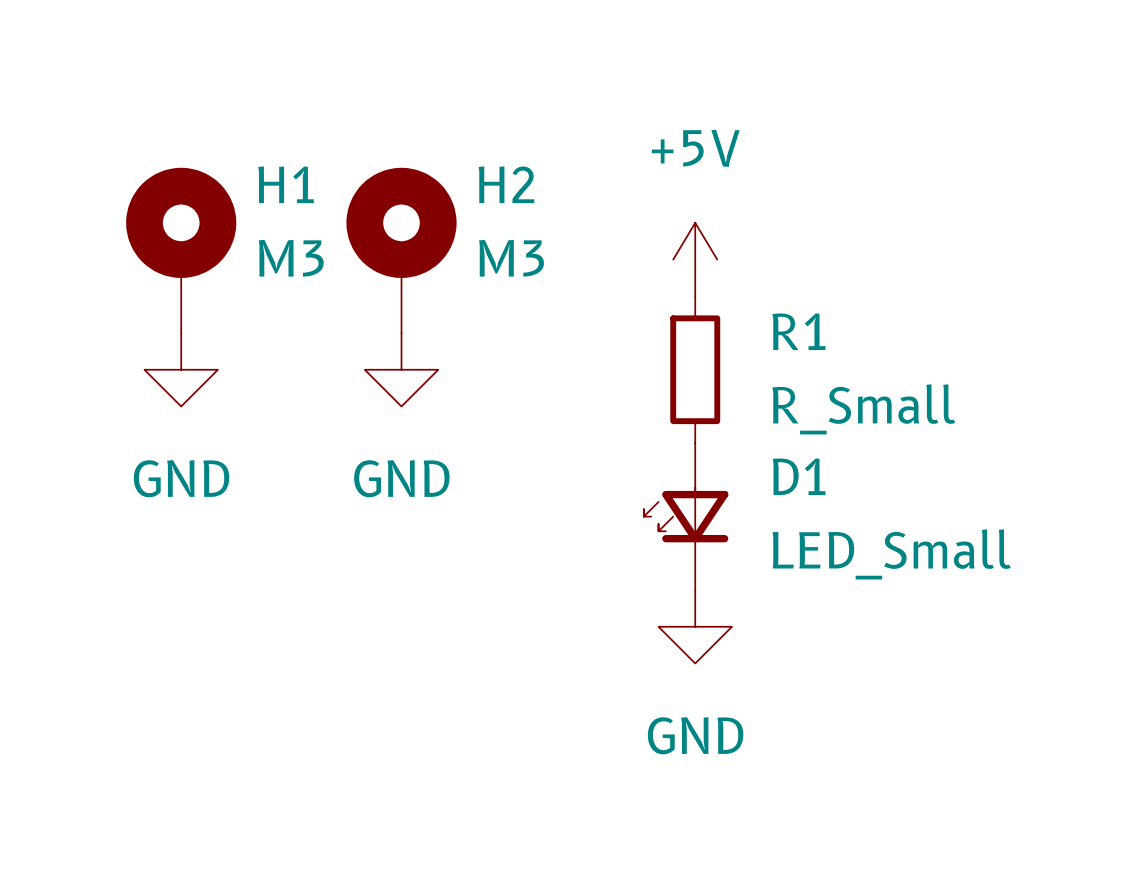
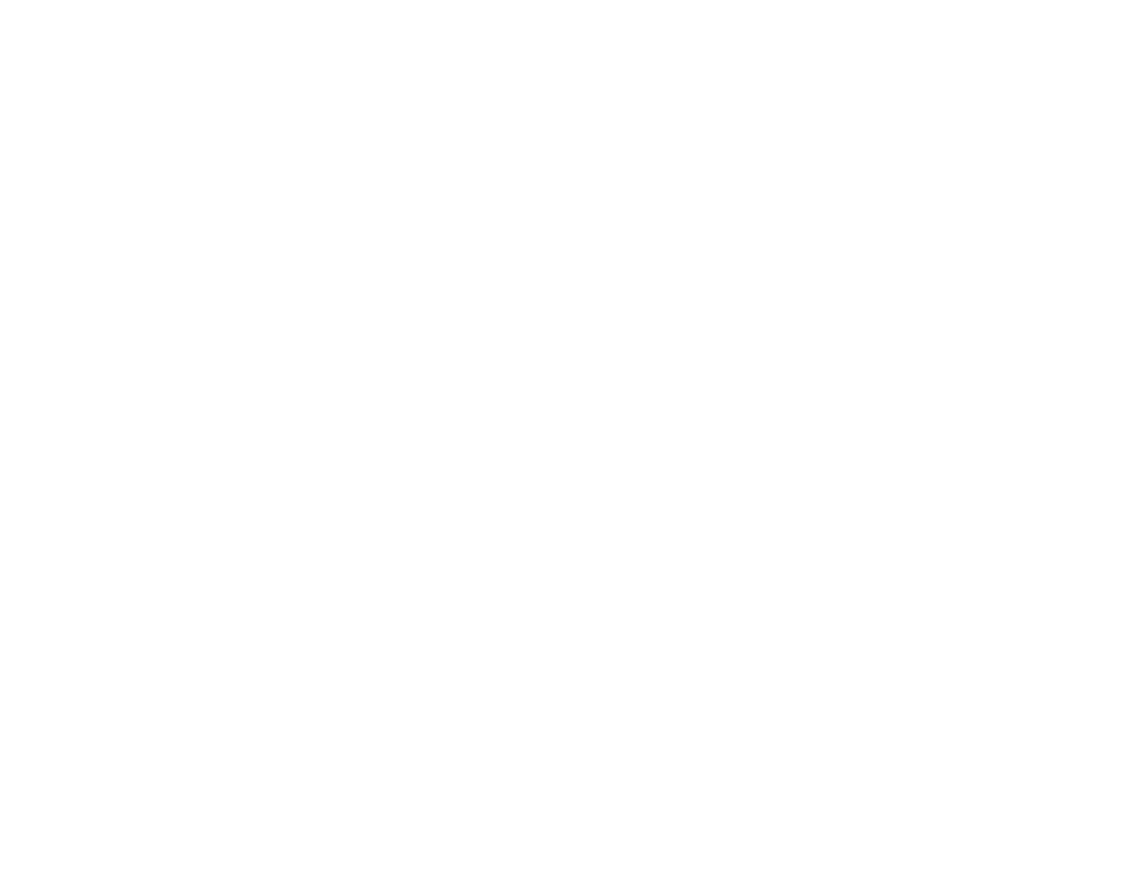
H1: M3 (181, 250) -> none
H2: M3 (401, 250) -> none
power symbol: +5V (695, 259) -> none
power symbol: GND (181, 369) -> none
power symbol: GND (401, 369) -> none
R1: R_Small (695, 369) -> none
D1: LED_Small (686, 516) -> none
power symbol: GND (695, 626) -> none

